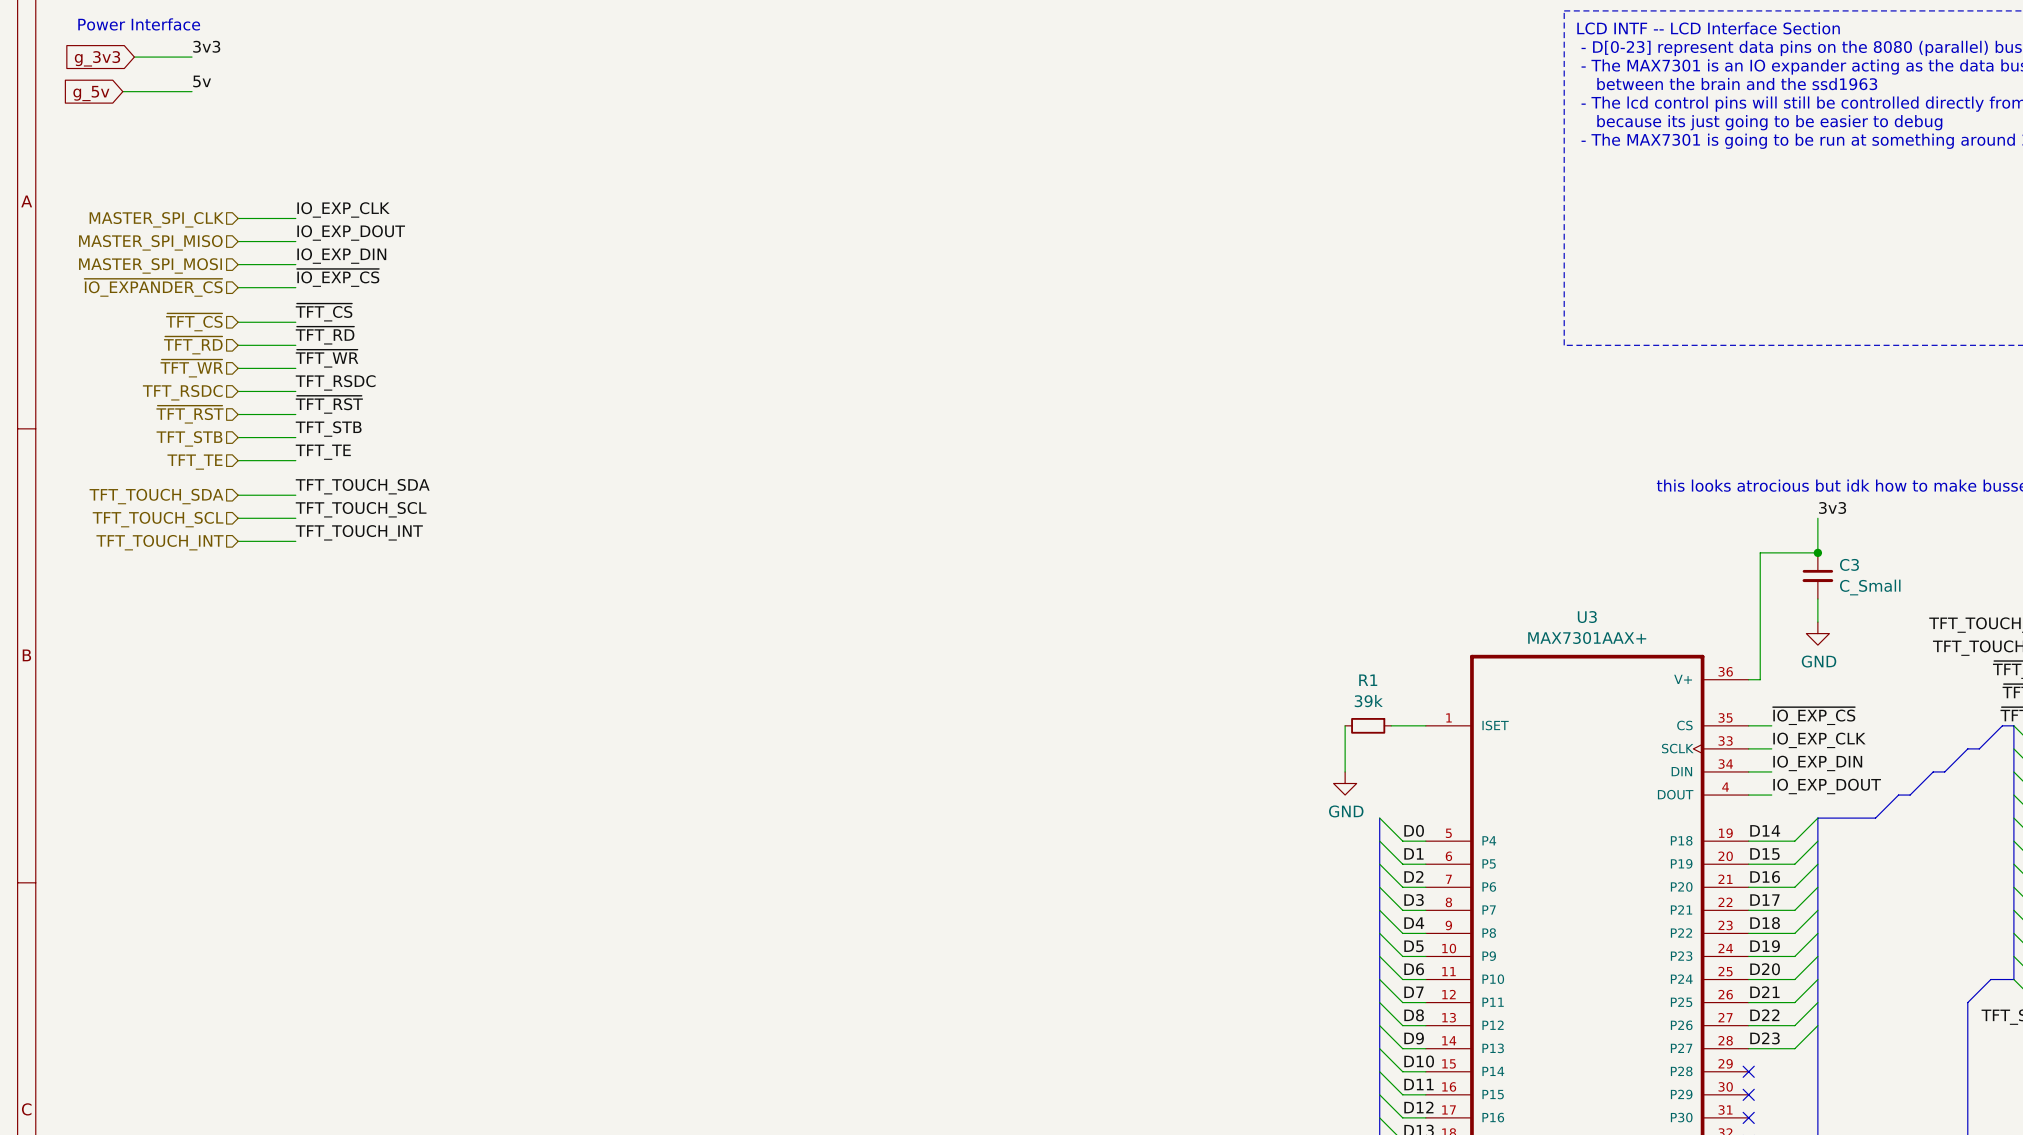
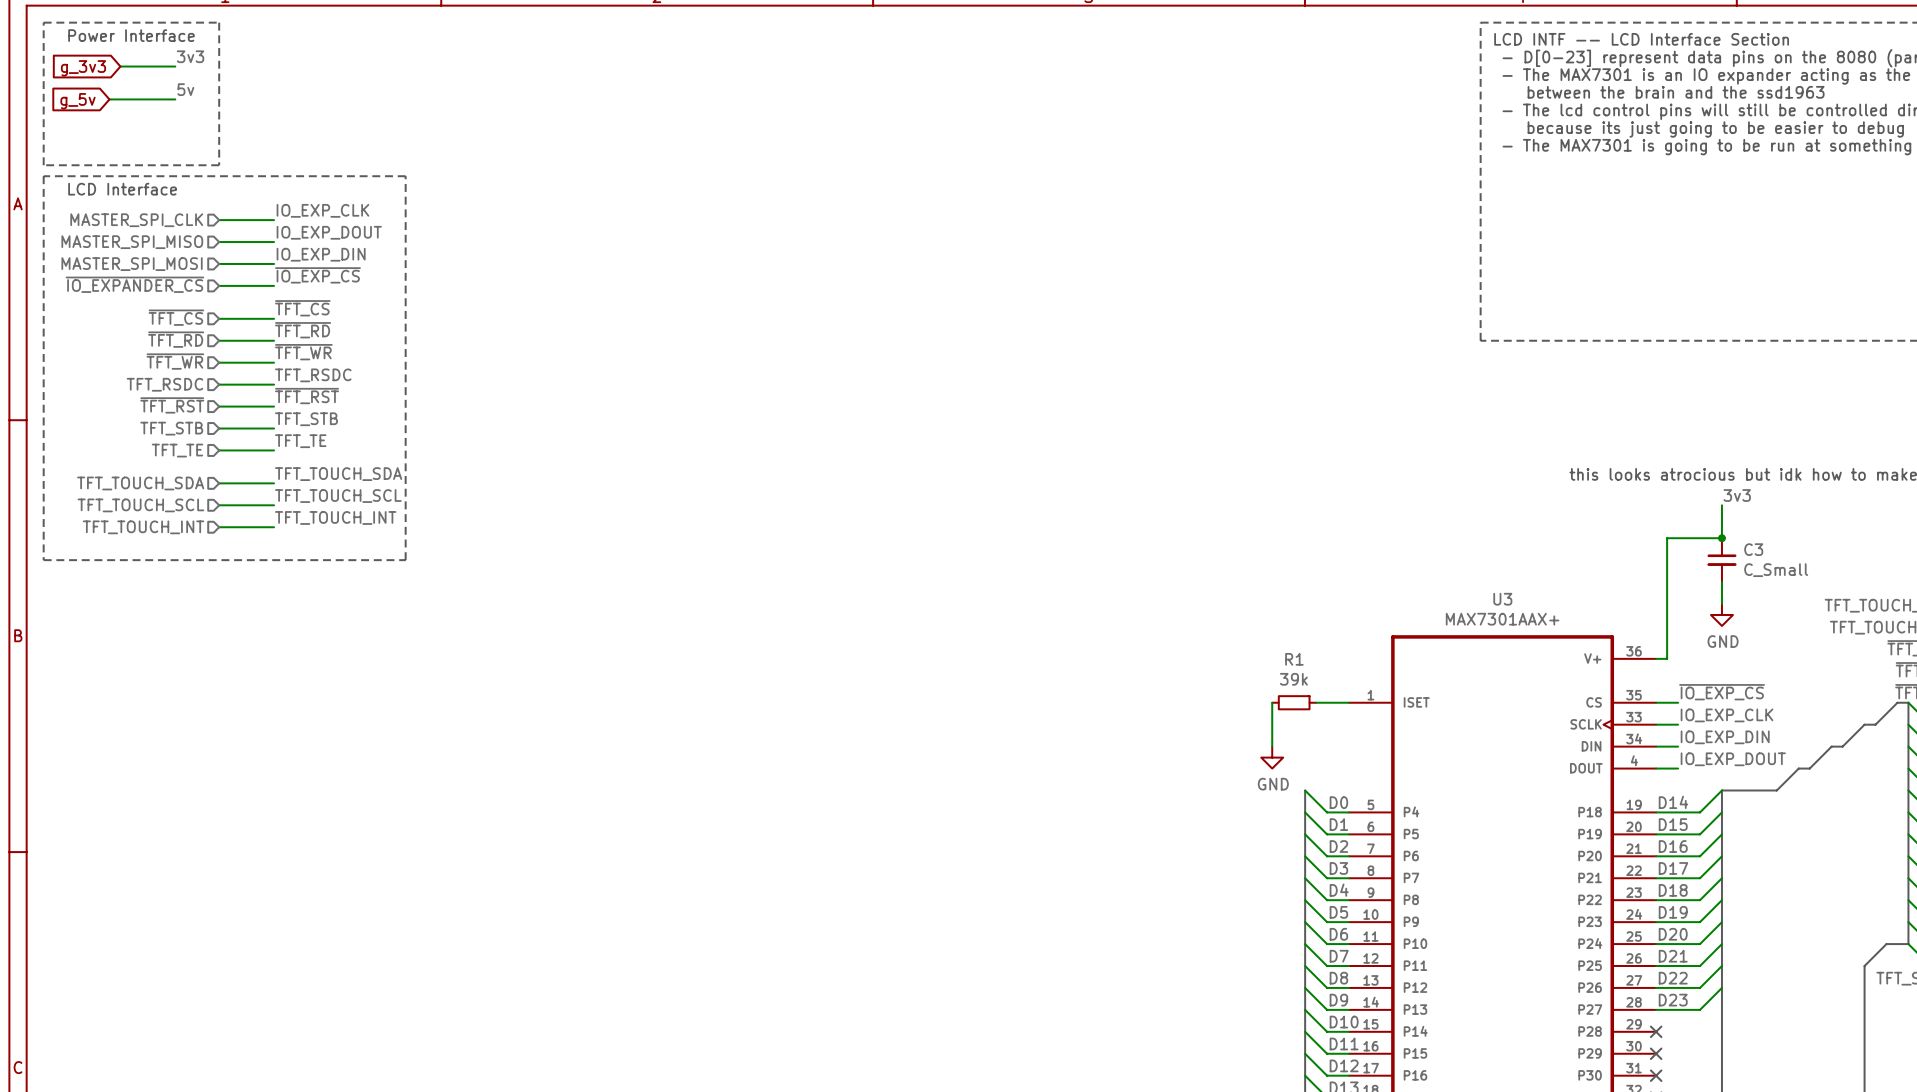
line: none -> (43, 22) (219, 22) (219, 165) (43, 165) (43, 22)
line: none -> (43, 176) (43, 560) (405, 560) (405, 176) (43, 176)
text: none -> LCD Interface (122, 189)

